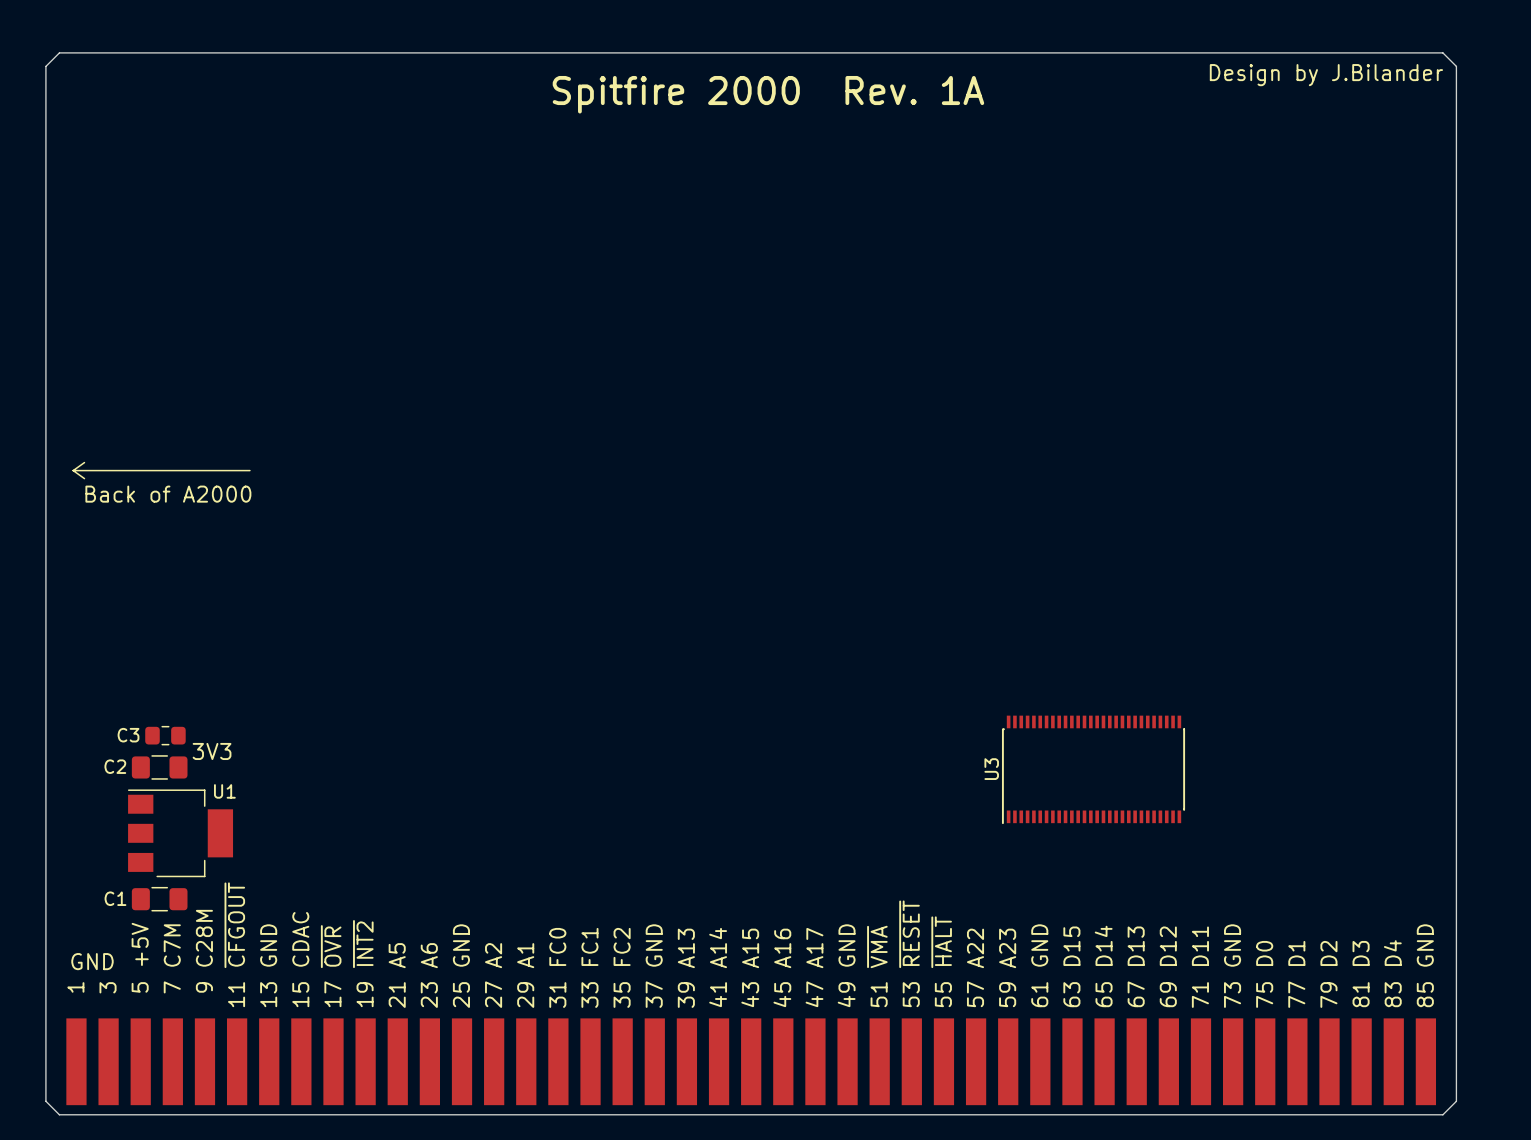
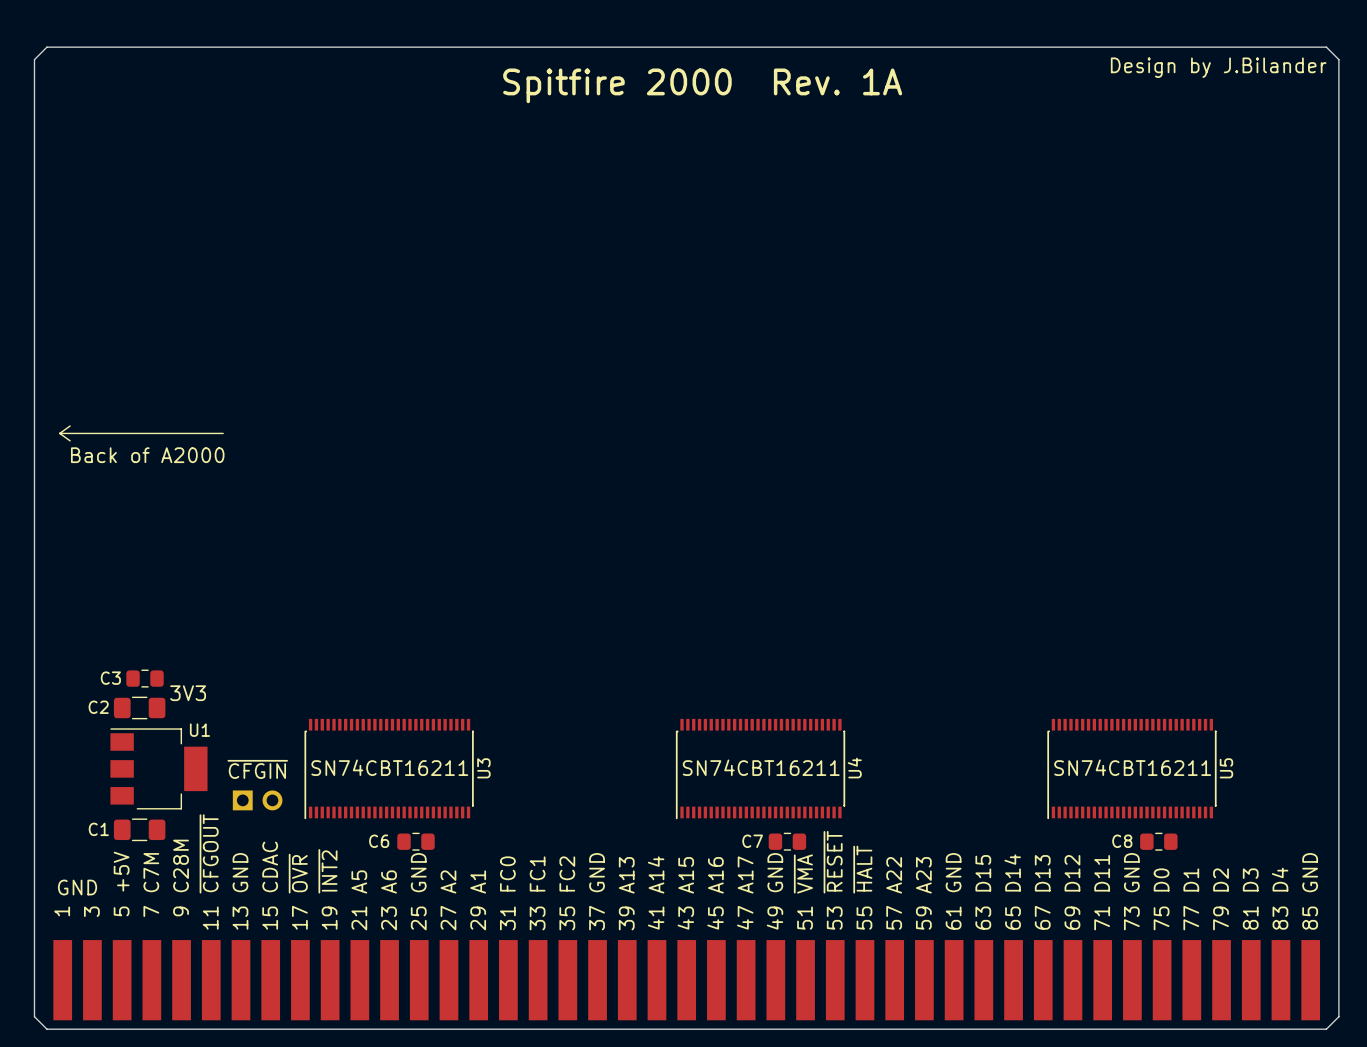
U3 name position: U3 (991, 769) -> U3 (483, 768)
U3 position: (1093, 769) -> (389, 769)
text: none -> SN74CBT16211 (389, 767)
text: none -> SN74CBT16211 (761, 767)
text: none -> SN74CBT16211 (1132, 767)
text: none -> ~{CFGIN} (257, 769)
U4: none -> (760, 769)
U5: none -> (1131, 769)
part: none -> (257, 800)
C6: none -> (416, 841)
C7: none -> (787, 841)
C8: none -> (1158, 841)

